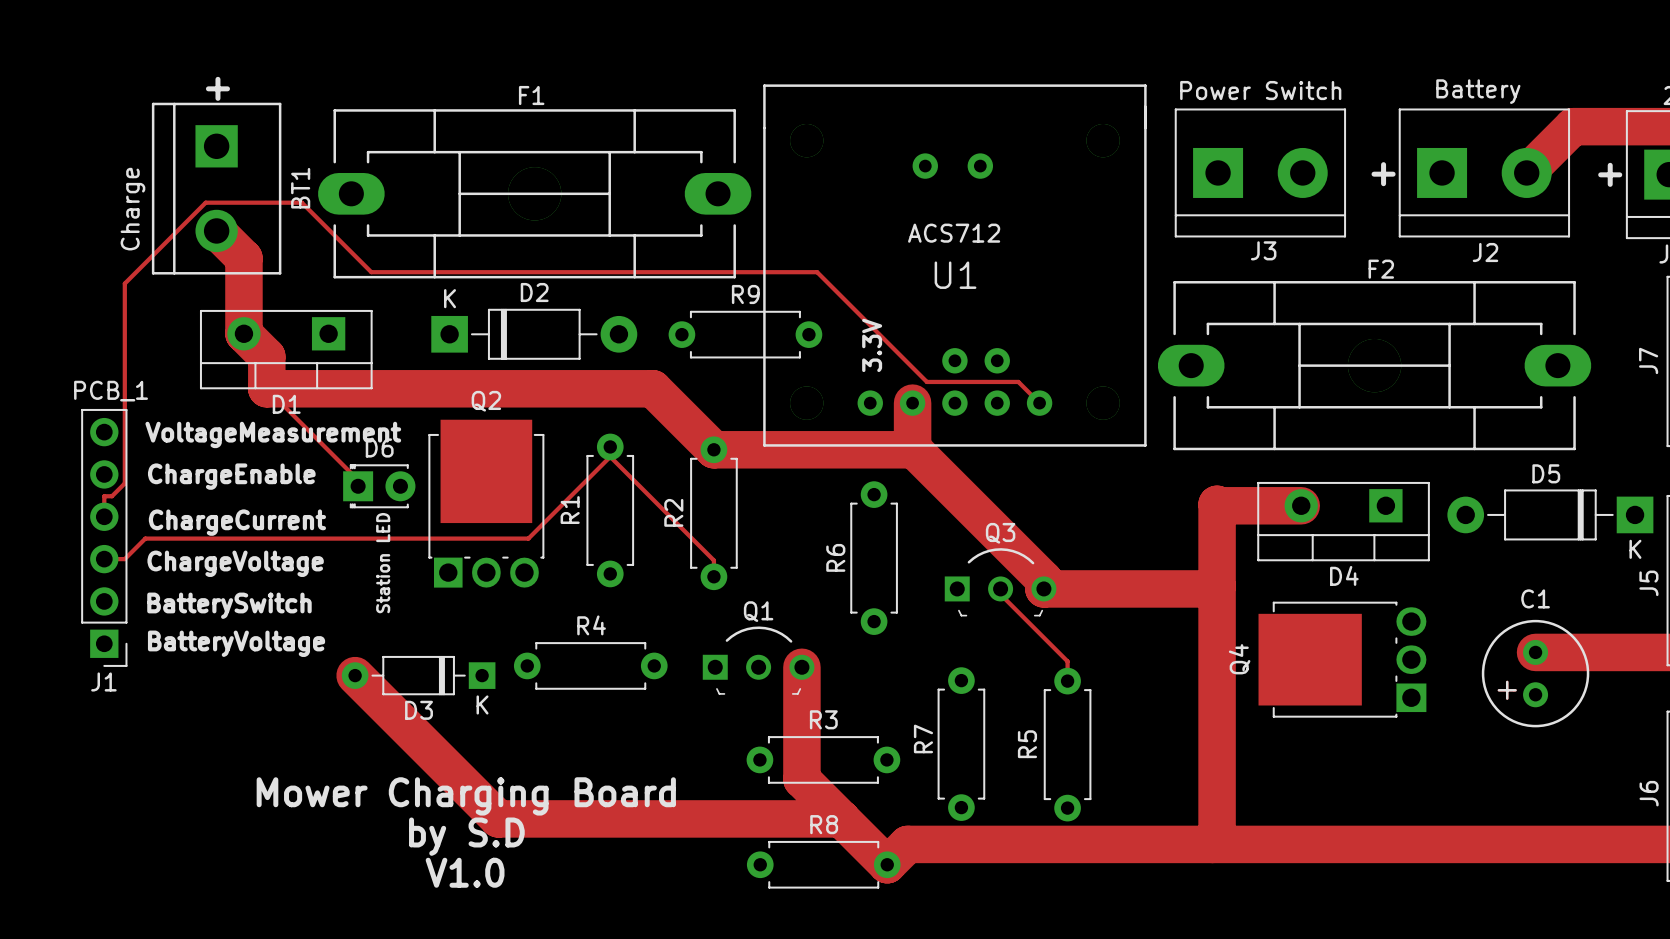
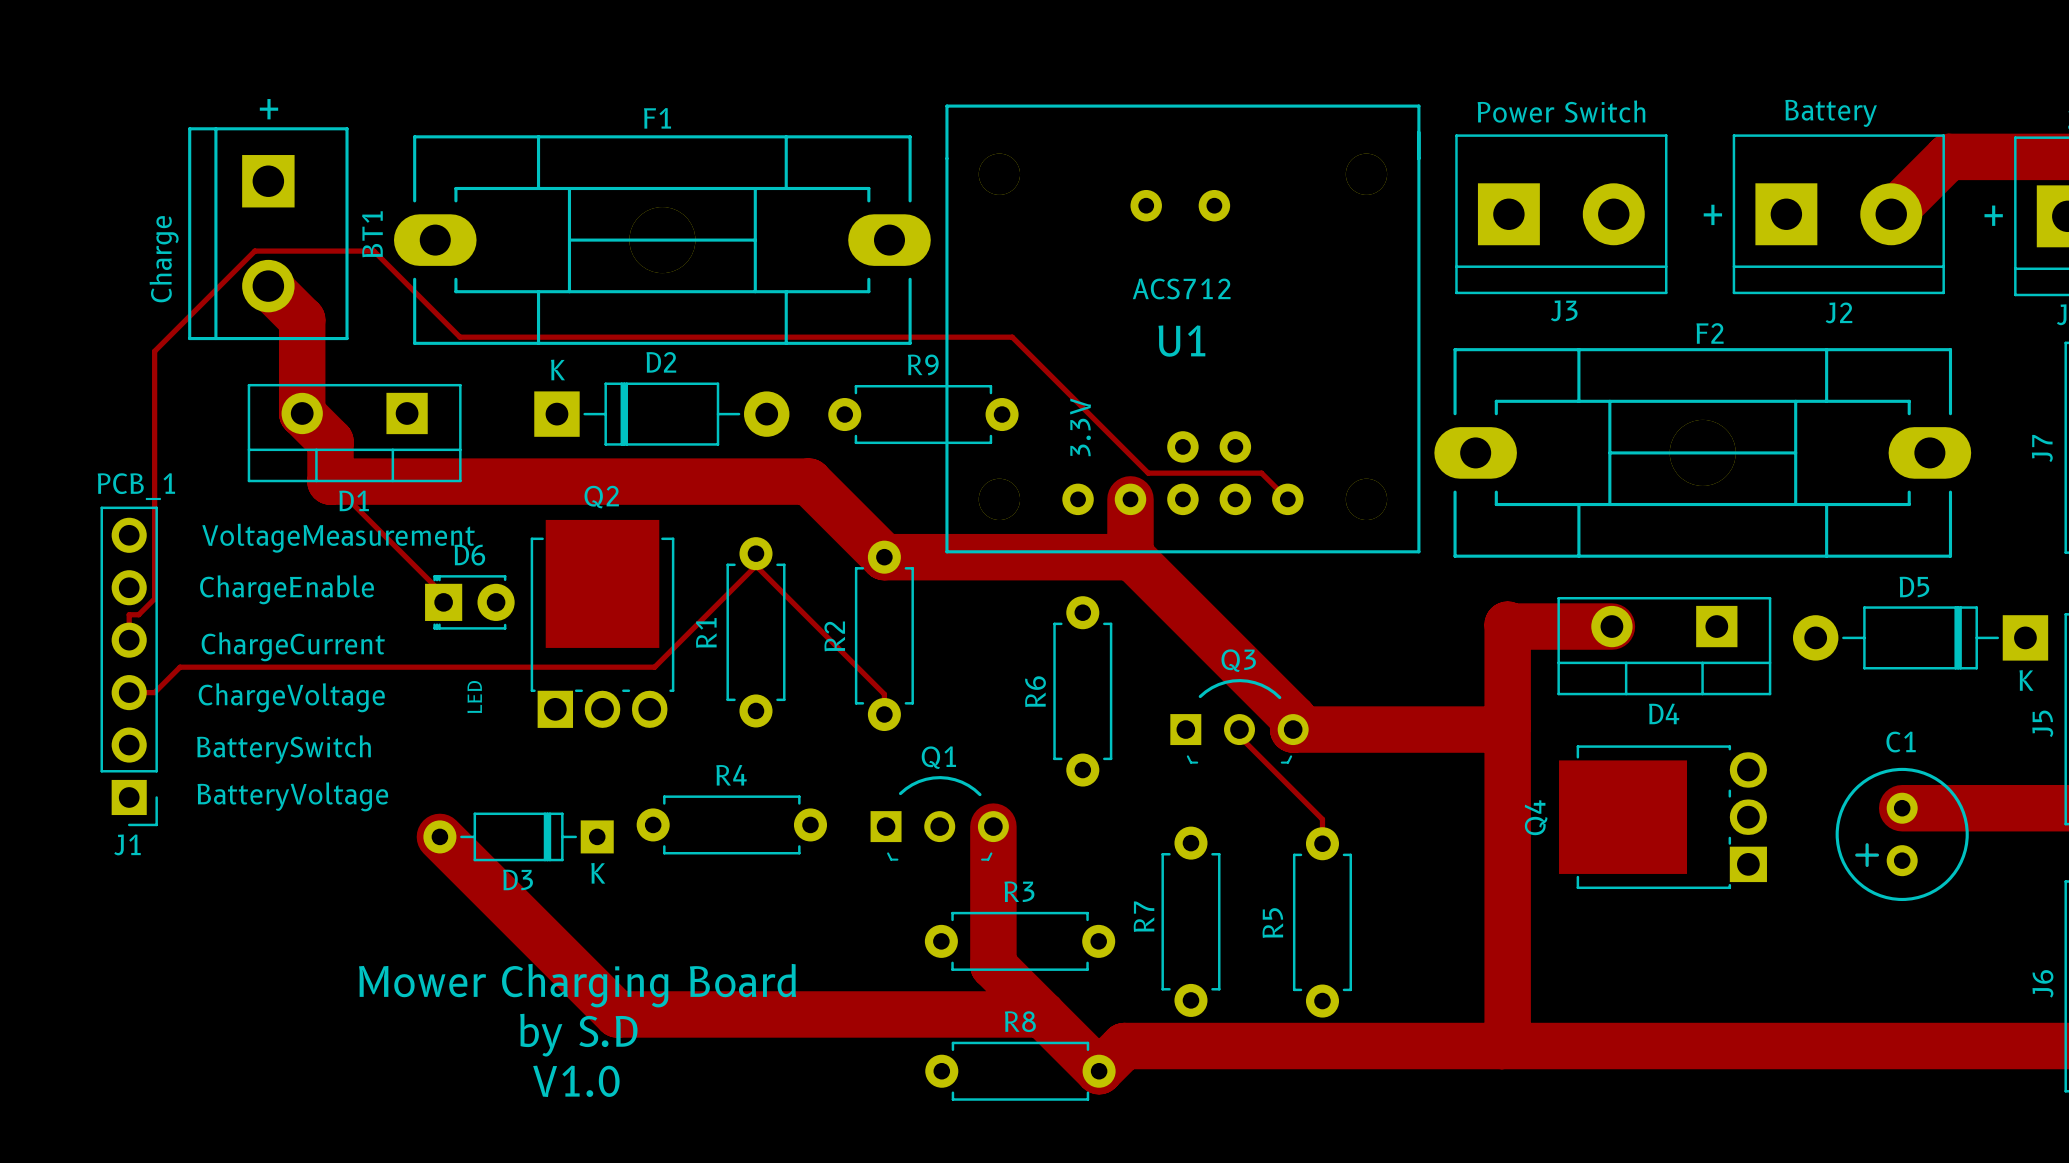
D6 value: Station LED (383, 563) -> LED (474, 697)

